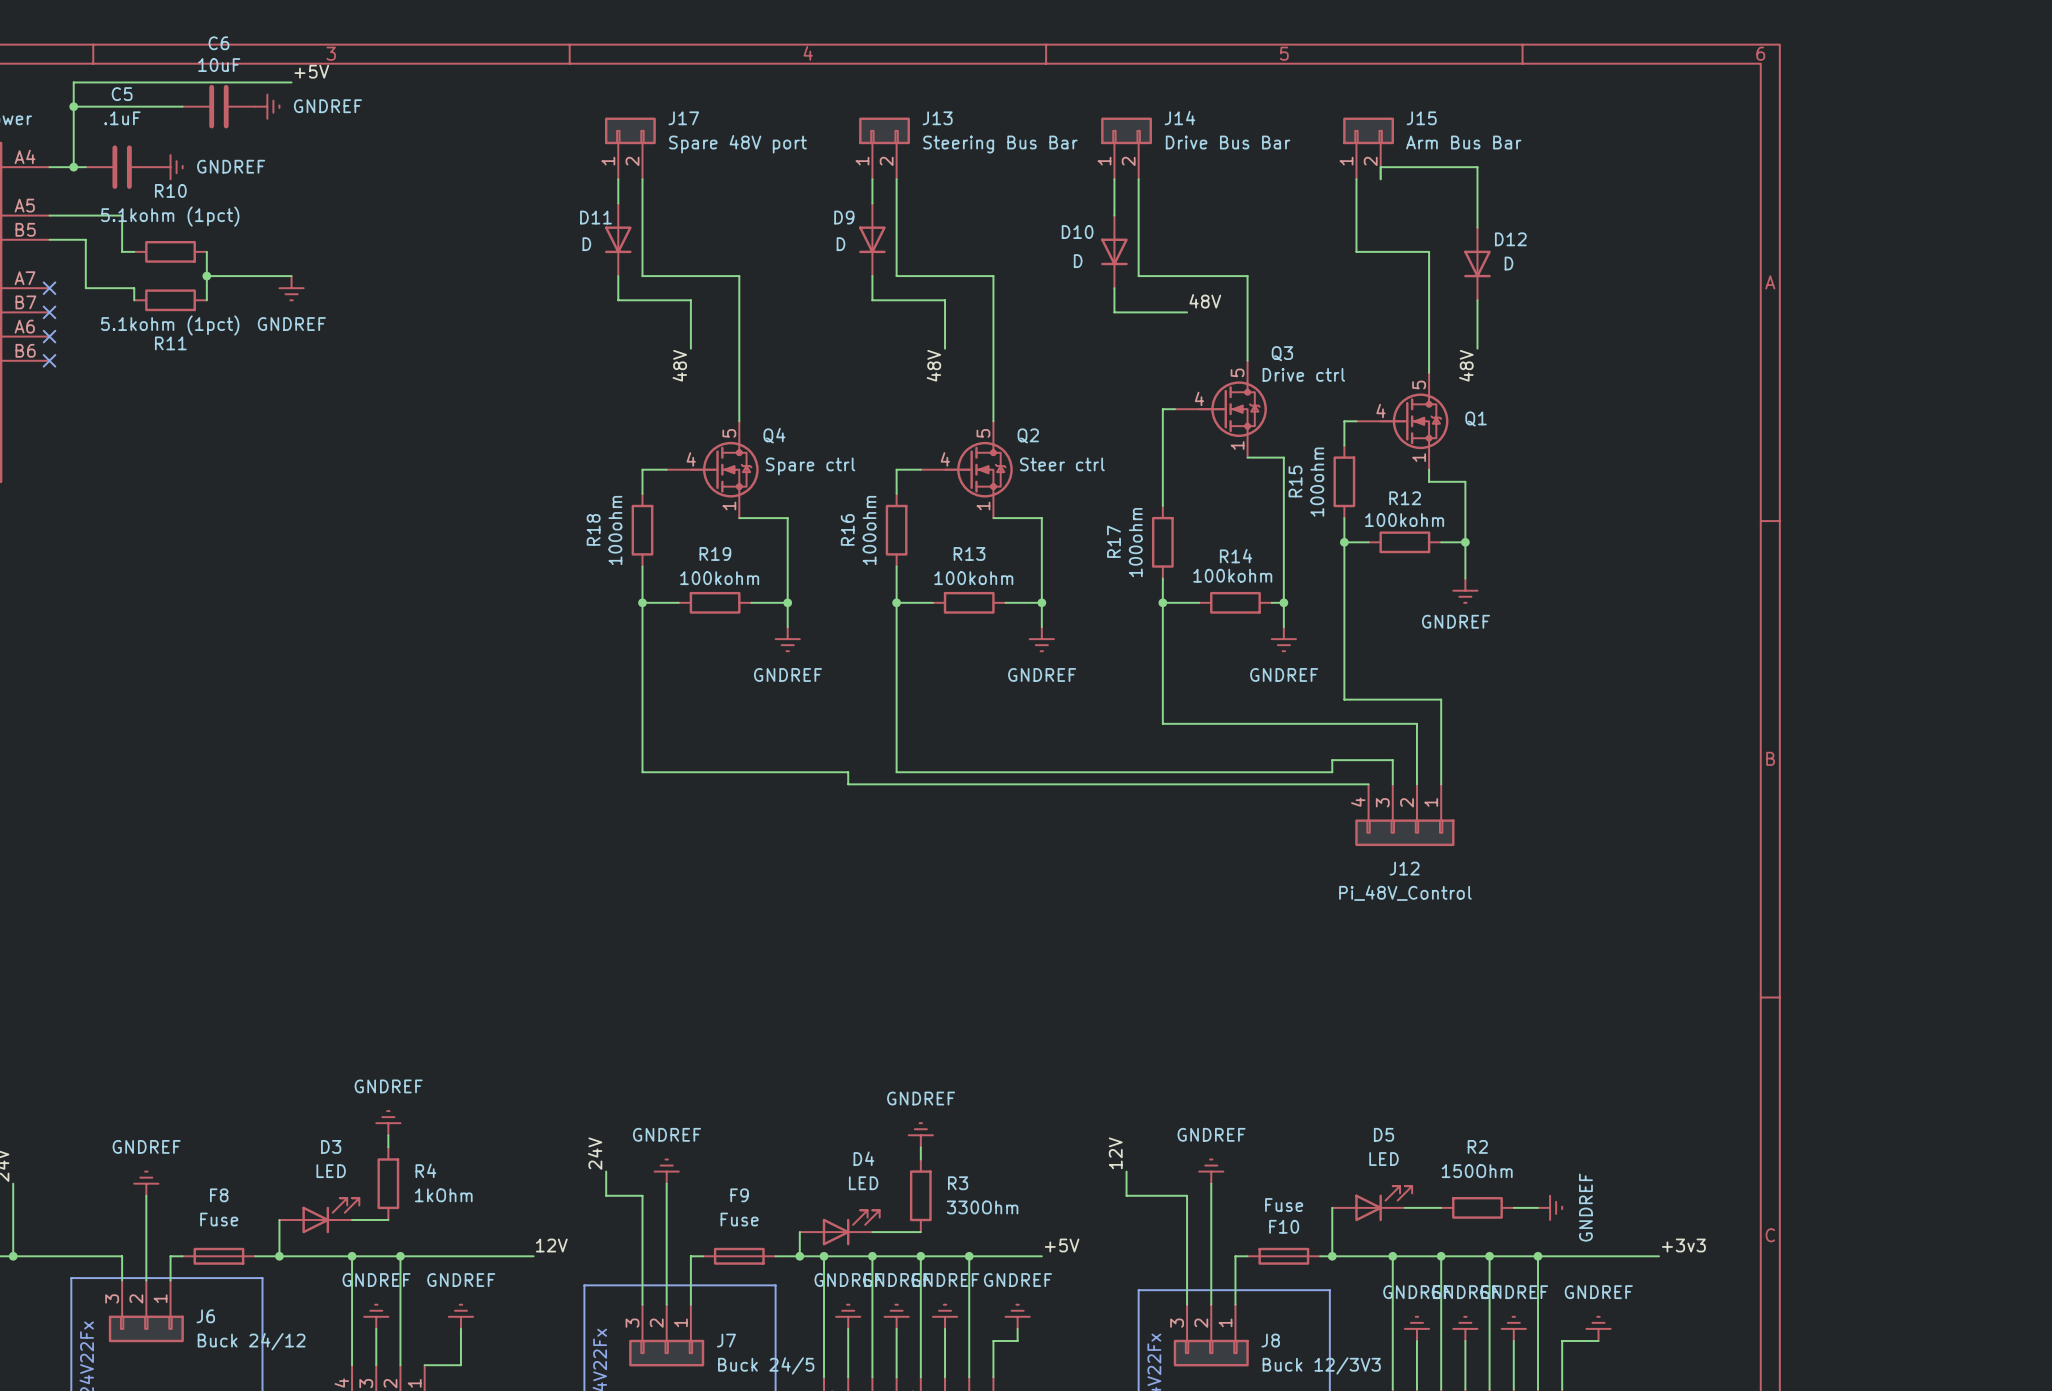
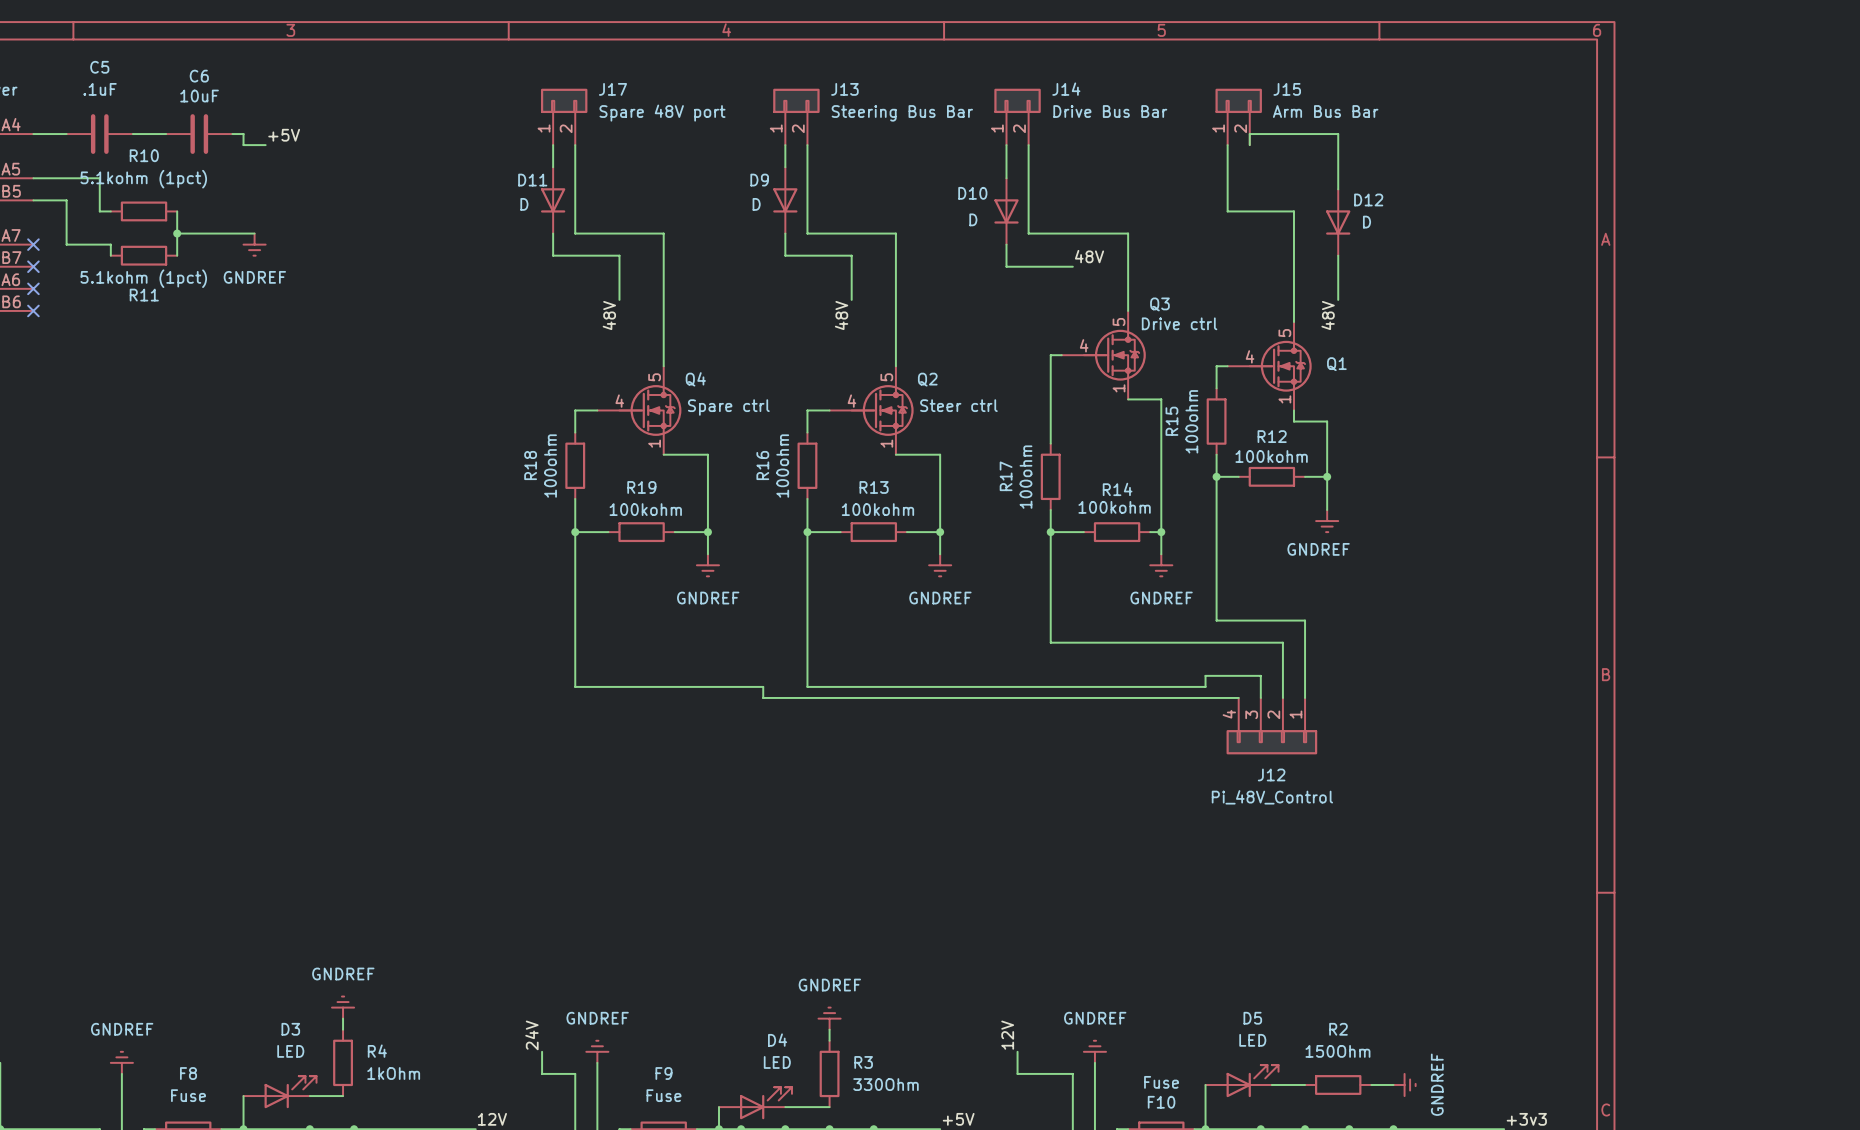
label position: +5V (311, 71) -> +5V (284, 135)
wire: (291, 82) (73, 82) (73, 167) -> none
wire: (73, 106) (182, 106) -> none
junction: (73, 106) -> none
C6 position: (218, 106) -> (199, 134)
power symbol: GNDREF (267, 106) -> none
junction: (73, 167) -> none
wire: none -> (132, 134) (166, 134)
power symbol: GNDREF (170, 167) -> none
wire: none -> (232, 134) (243, 134) (243, 145) (265, 145)

